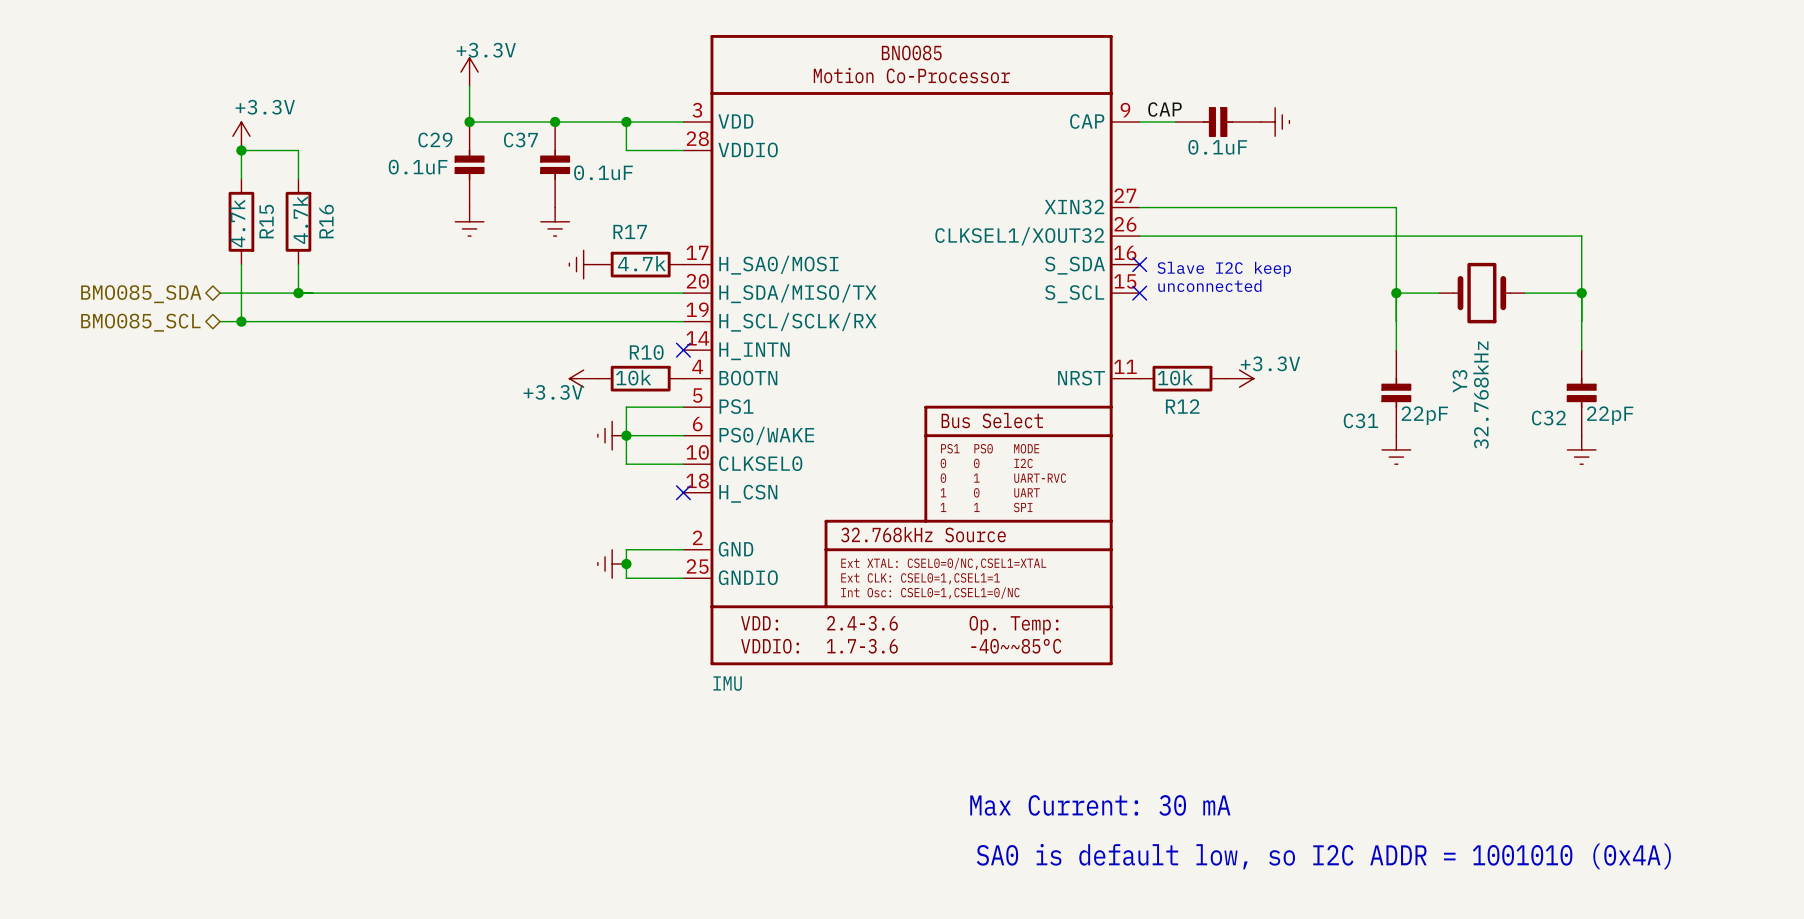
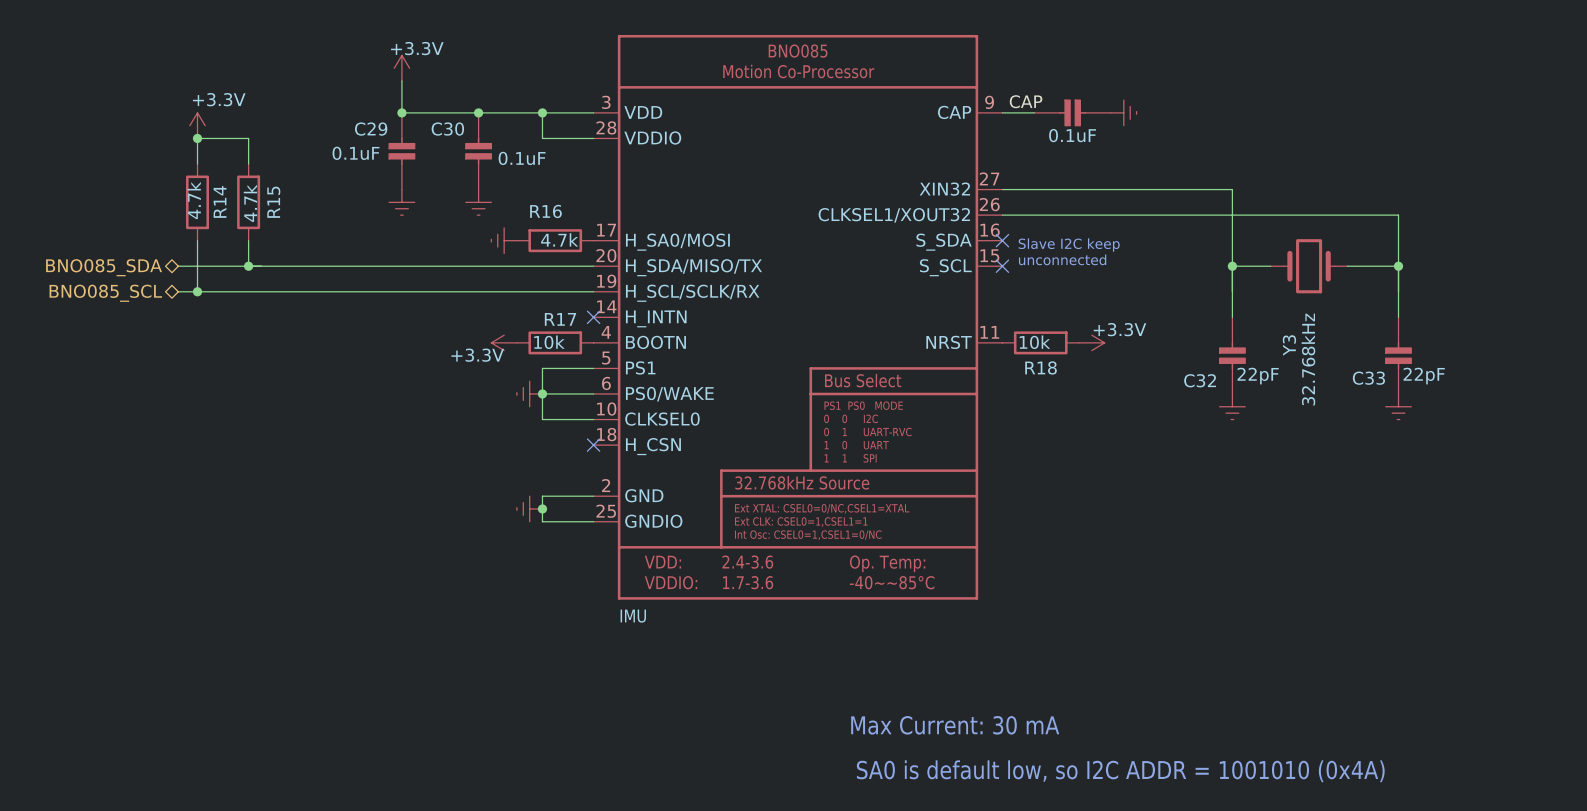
C37 name: C37 (520, 140) -> C30 (447, 129)
R15 name: R15 (266, 221) -> R14 (220, 201)
R16 name: R16 (326, 221) -> R15 (273, 202)
R17 name: R17 (630, 231) -> R16 (545, 211)
hierarchical label: BMO085_SDA (141, 294) -> BNO085_SDA (104, 267)
hierarchical label: BMO085_SCL (140, 322) -> BNO085_SCL (105, 293)
R10 name: R10 (646, 352) -> R17 (560, 319)
R12 name: R12 (1182, 406) -> R18 (1041, 367)
C32 name: C32 (1548, 418) -> C33 (1368, 378)
C31 name: C31 (1360, 420) -> C32 (1200, 380)

